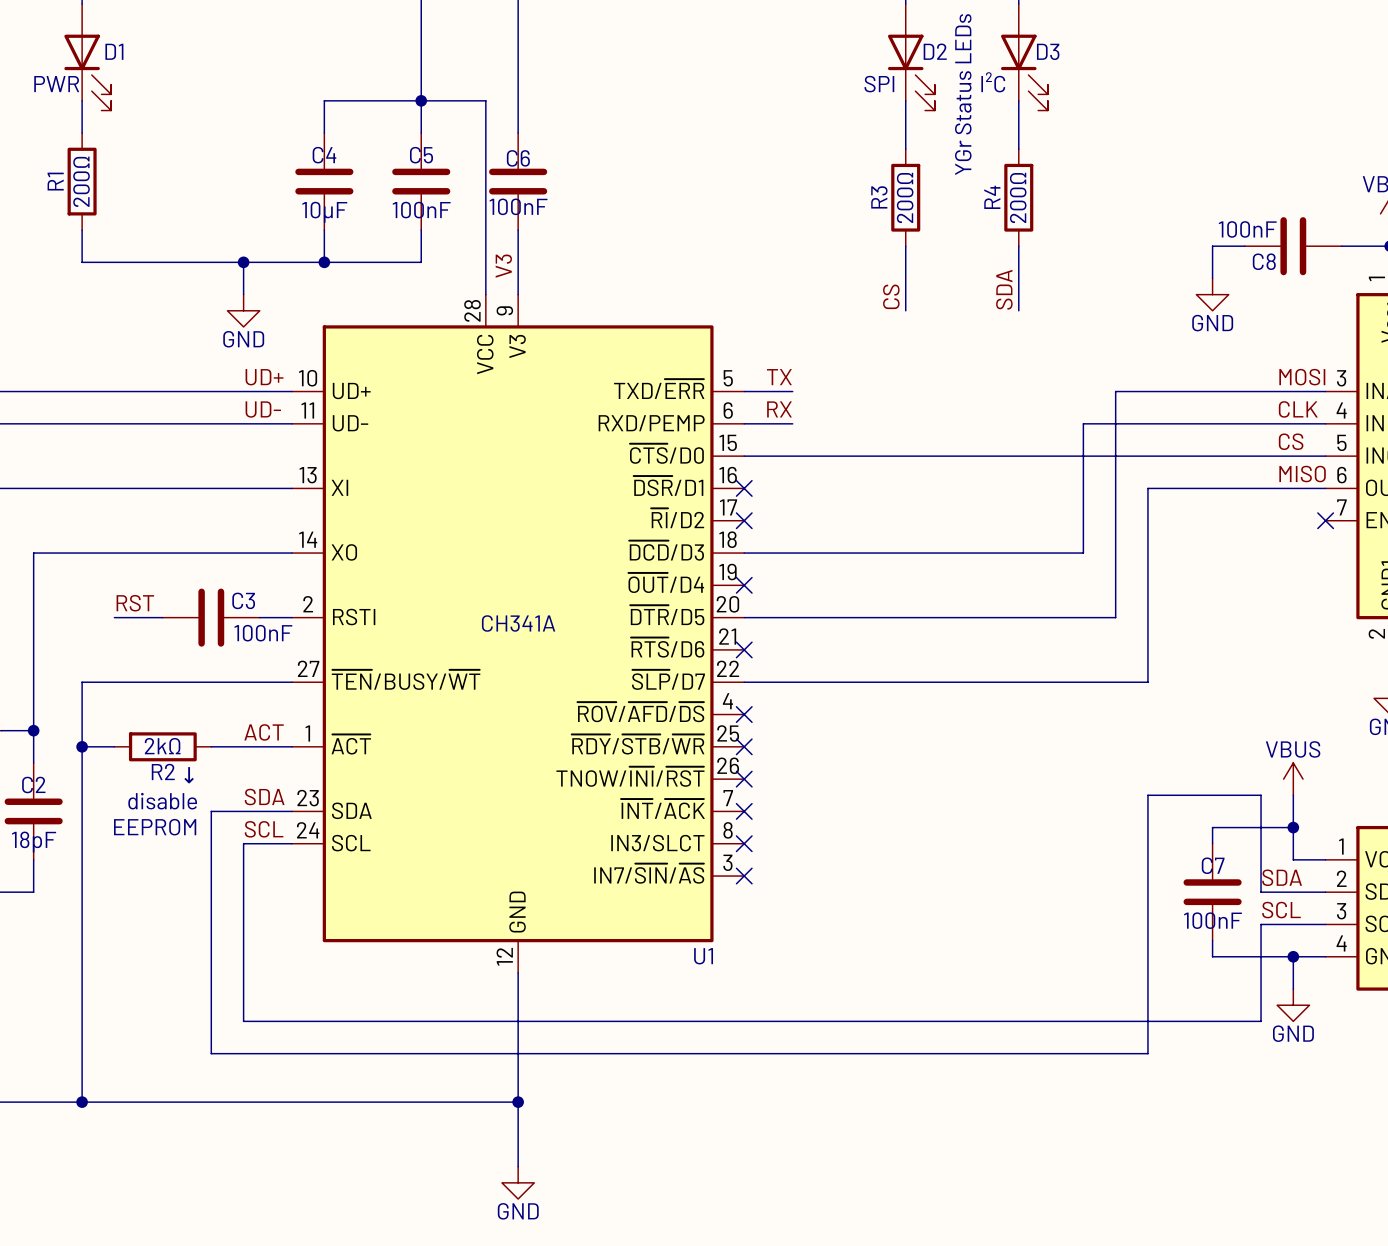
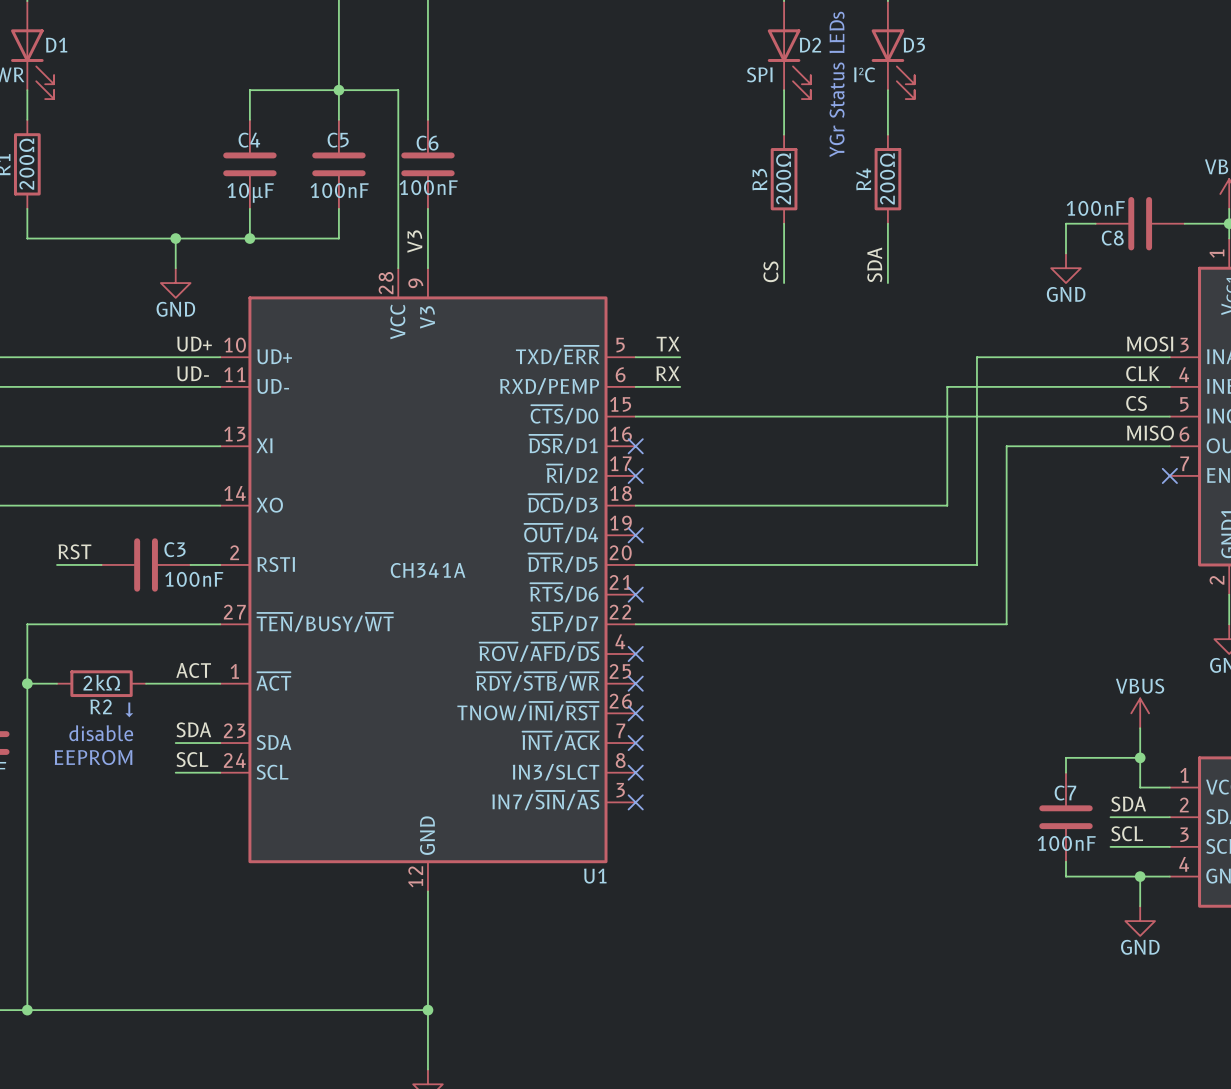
wire: (243, 811) (211, 811) (211, 1053) (1147, 1053) (1147, 795) (1261, 795) (1261, 892) -> none
wire: (243, 843) (243, 1021) (1261, 1021) (1261, 924) -> none

